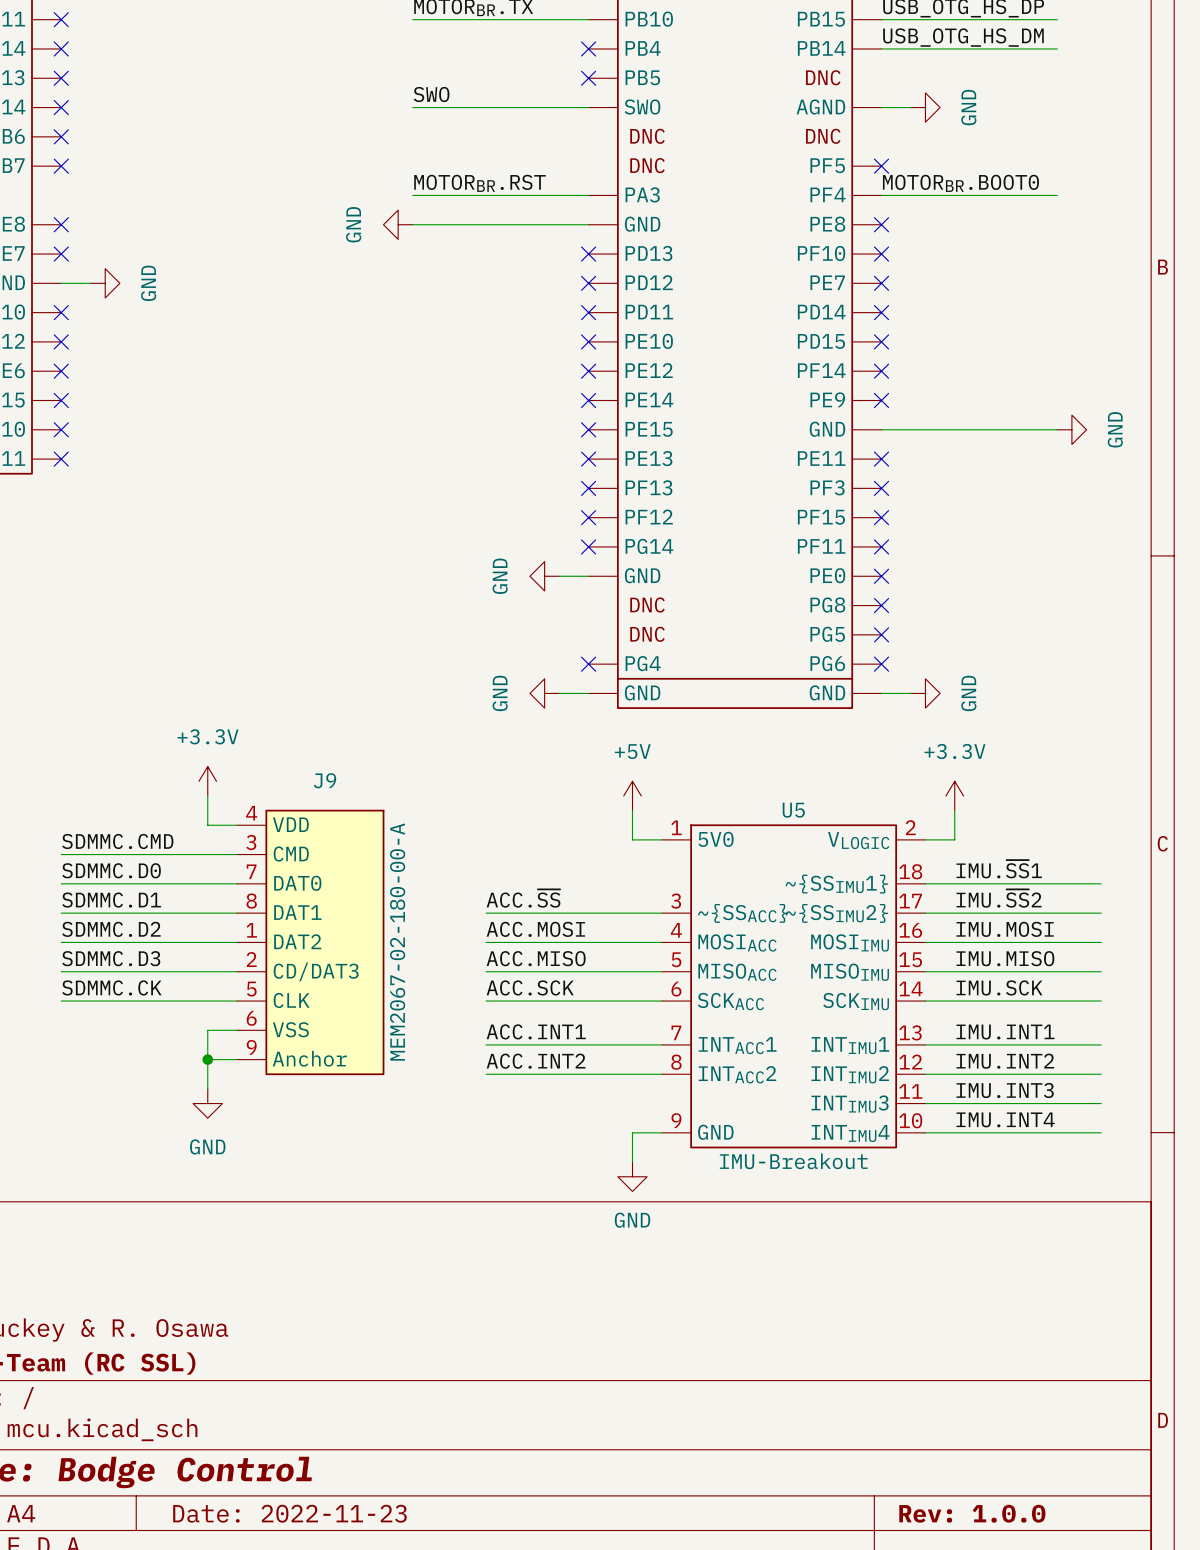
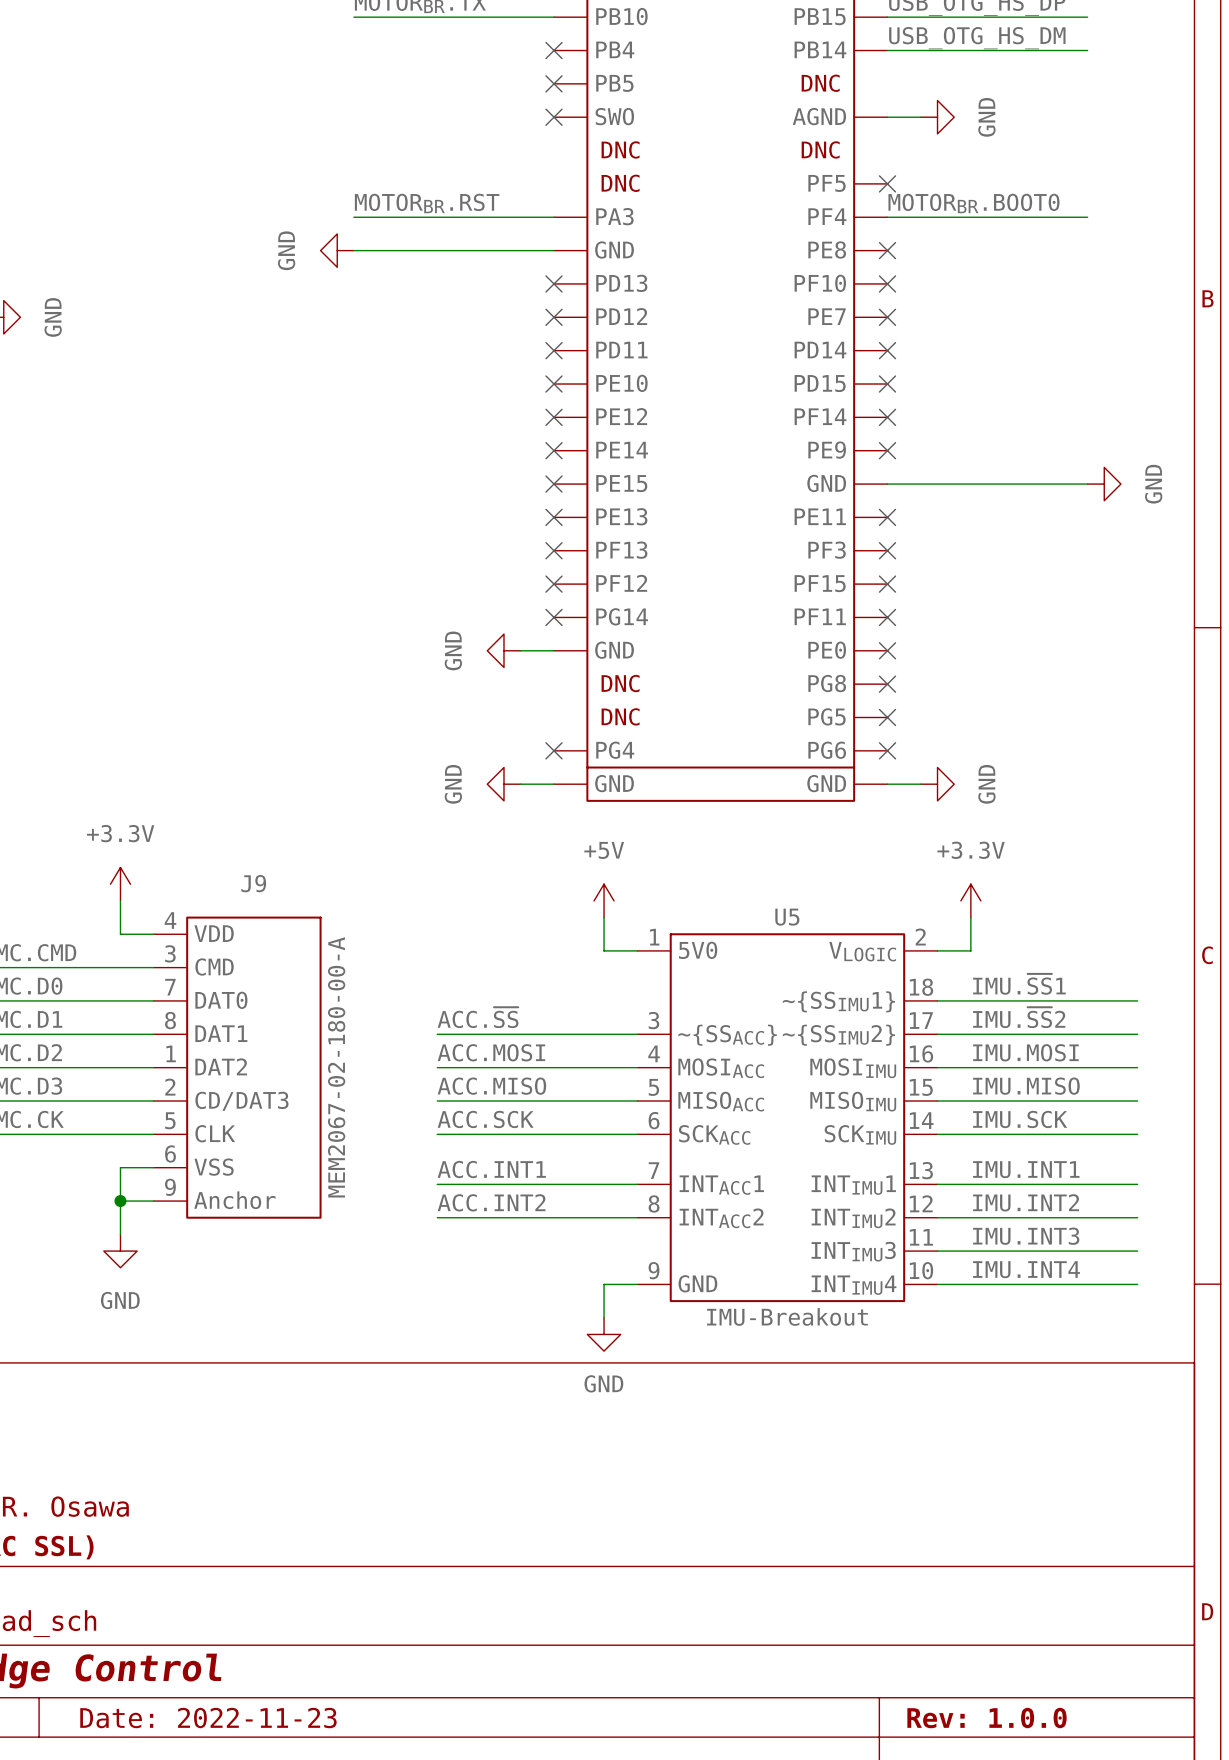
label: SWO (431, 94) -> none
wire: (412, 107) (588, 107) -> none
no-connect mark: none -> (554, 117)

